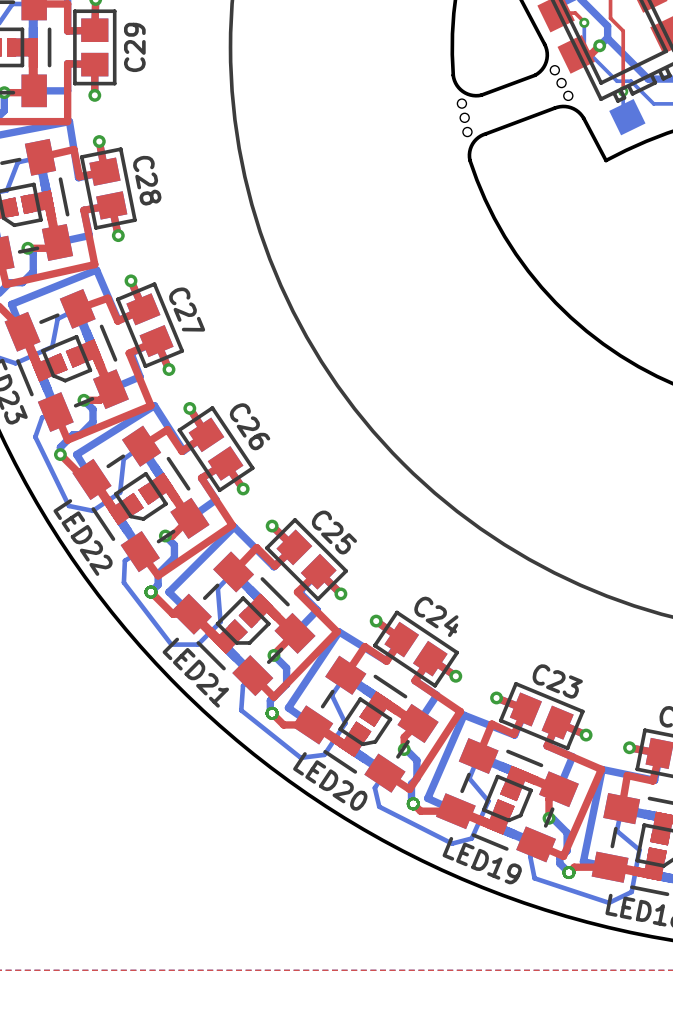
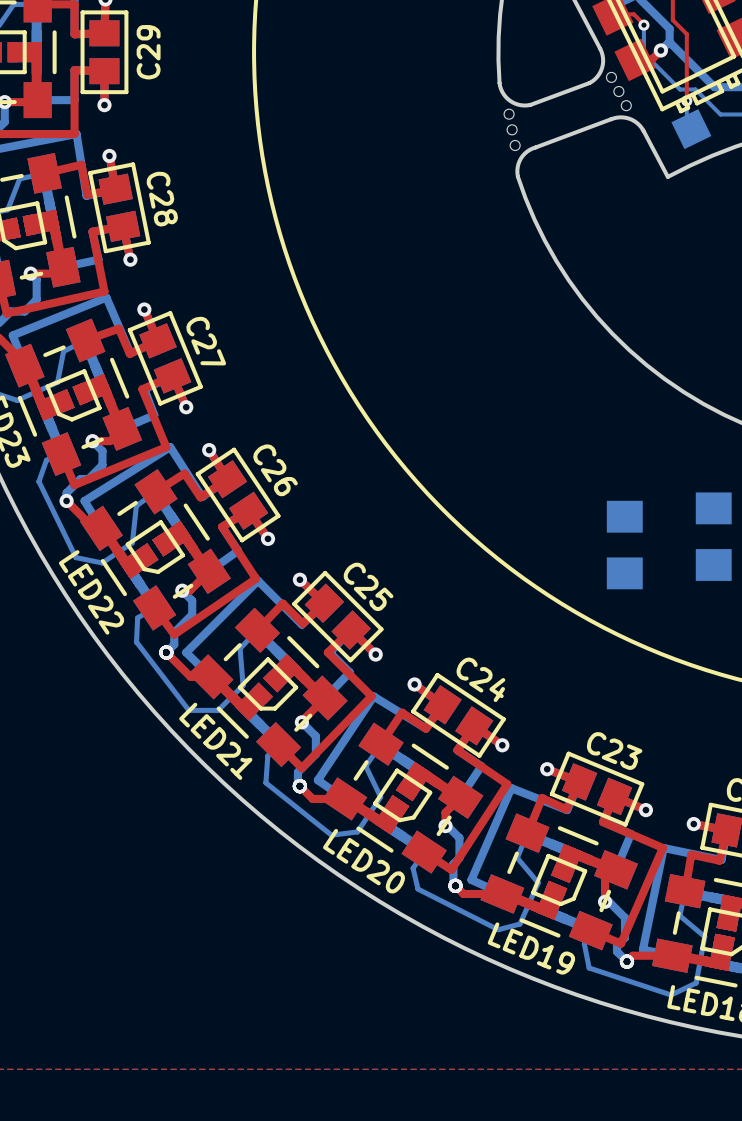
part: none -> (713, 536)
part: none -> (624, 545)

